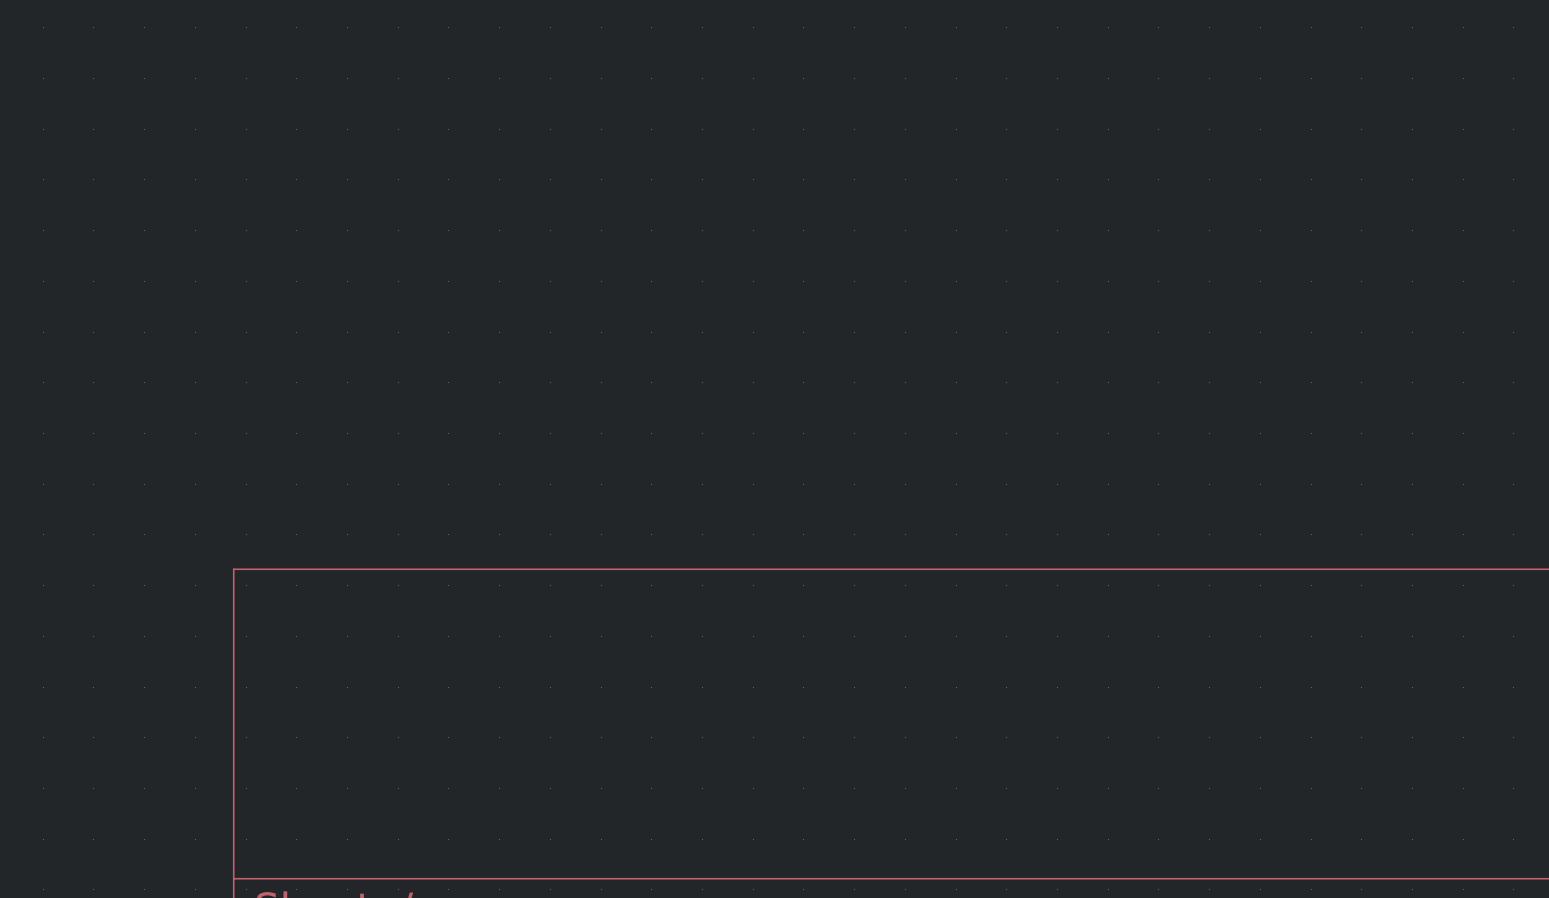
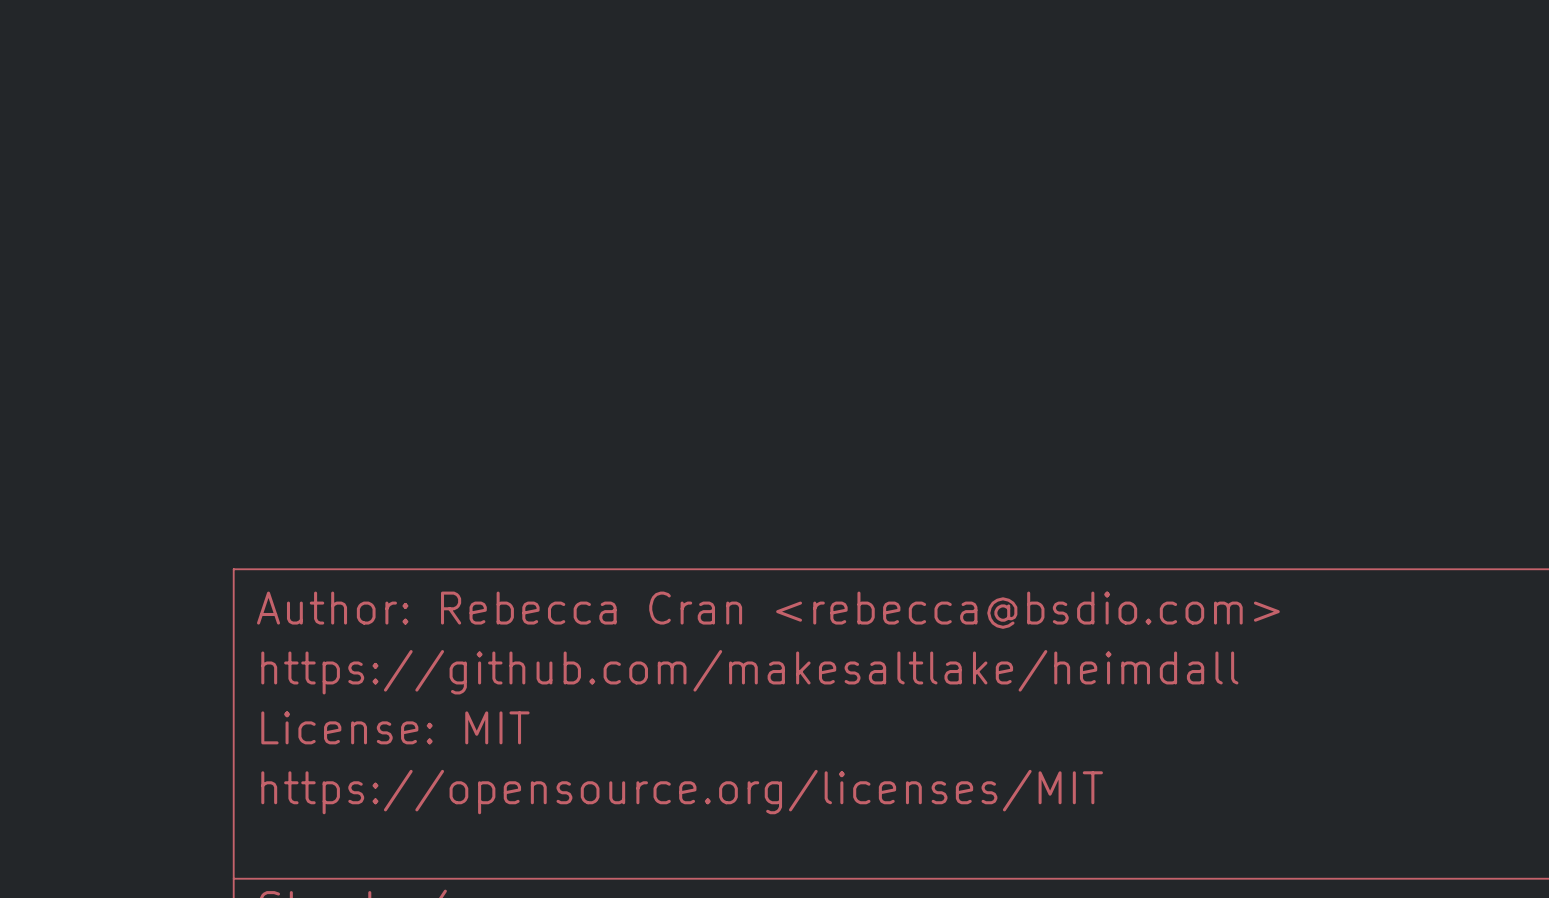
title block: none -> Author: Rebecca Cran <rebecca@bsdio.com> (768, 610)
title block: none -> https://github.com/makesaltlake/heimdall (749, 672)
title block: none -> License: MIT (395, 727)
title block: none -> https://opensource.org/licenses/MIT (682, 792)

